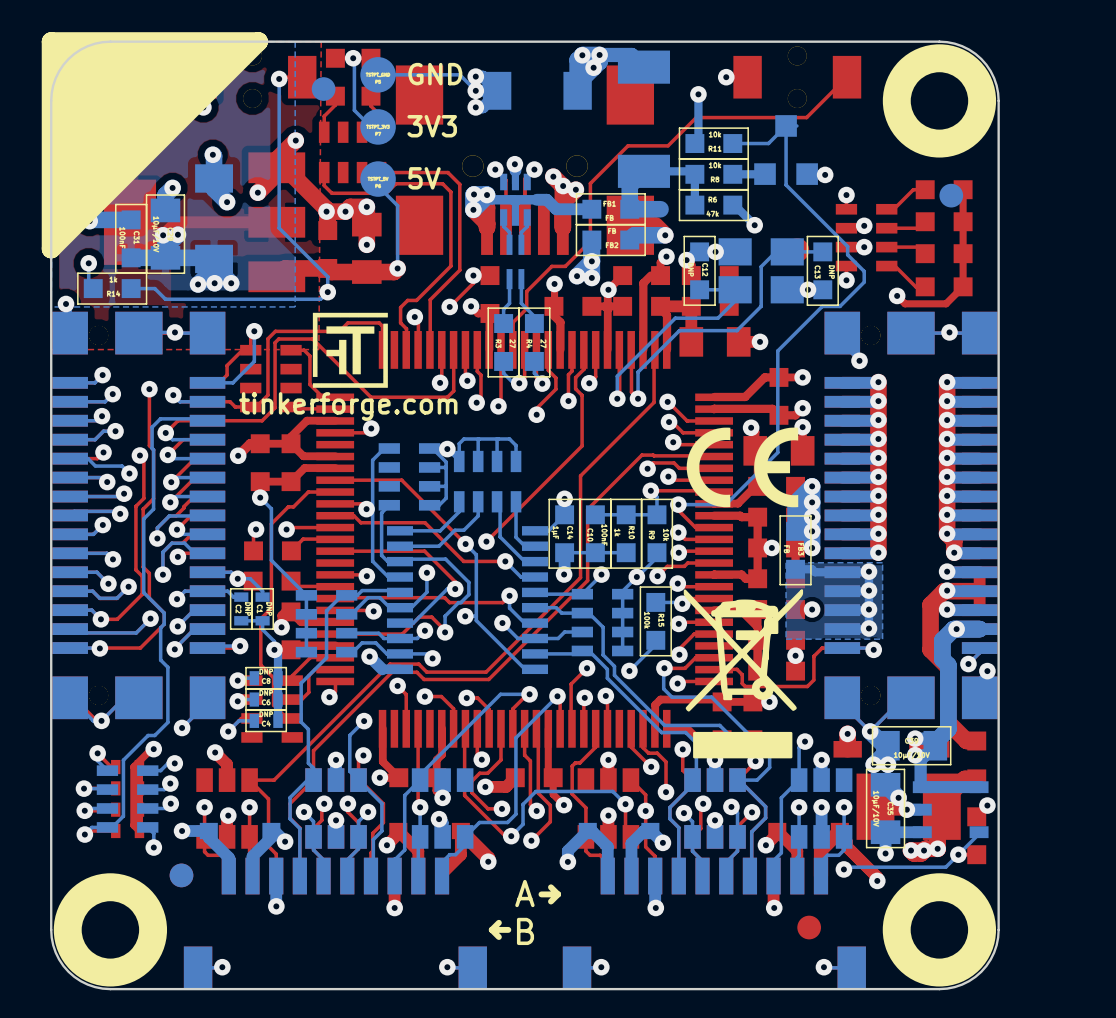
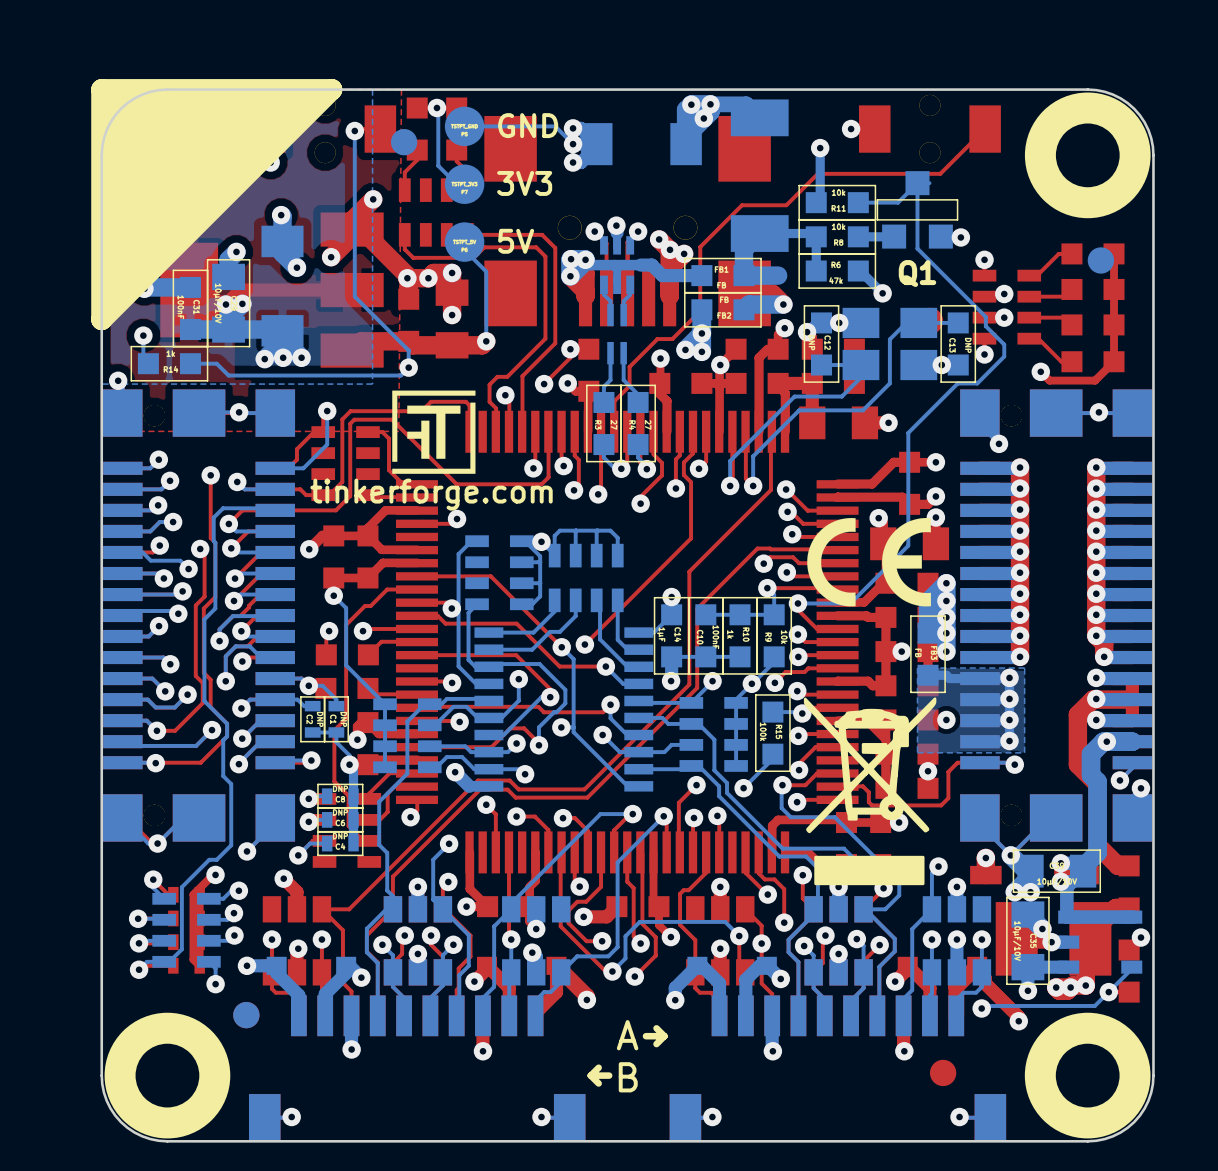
Q1: none -> (917, 209)

